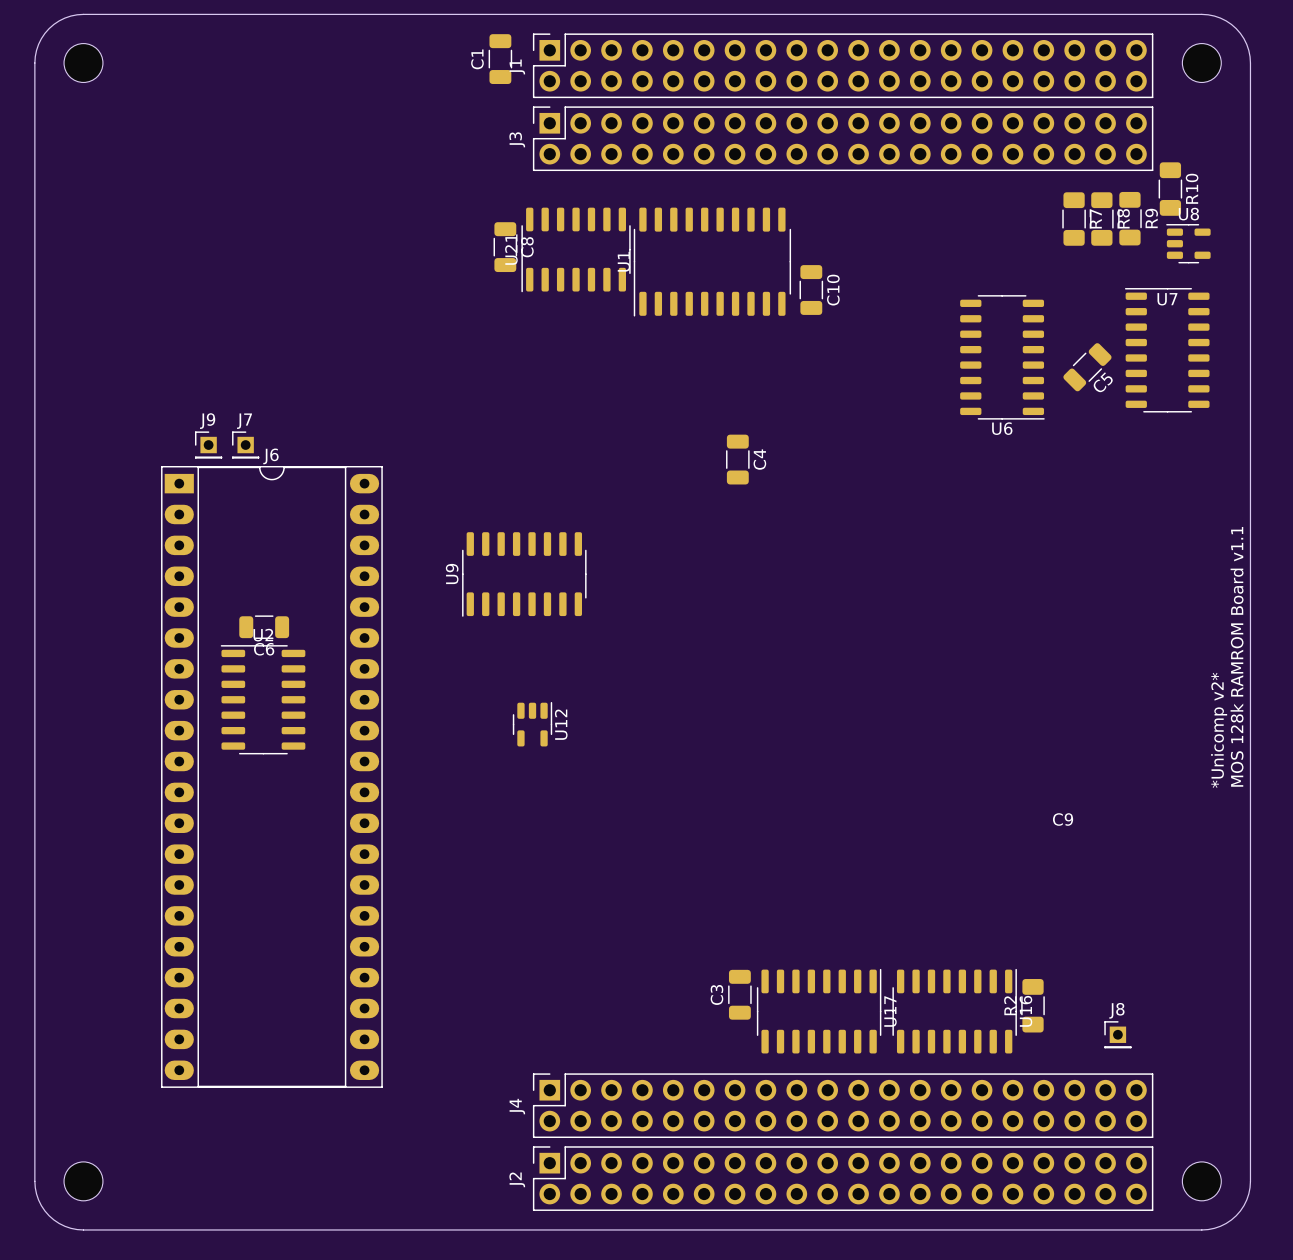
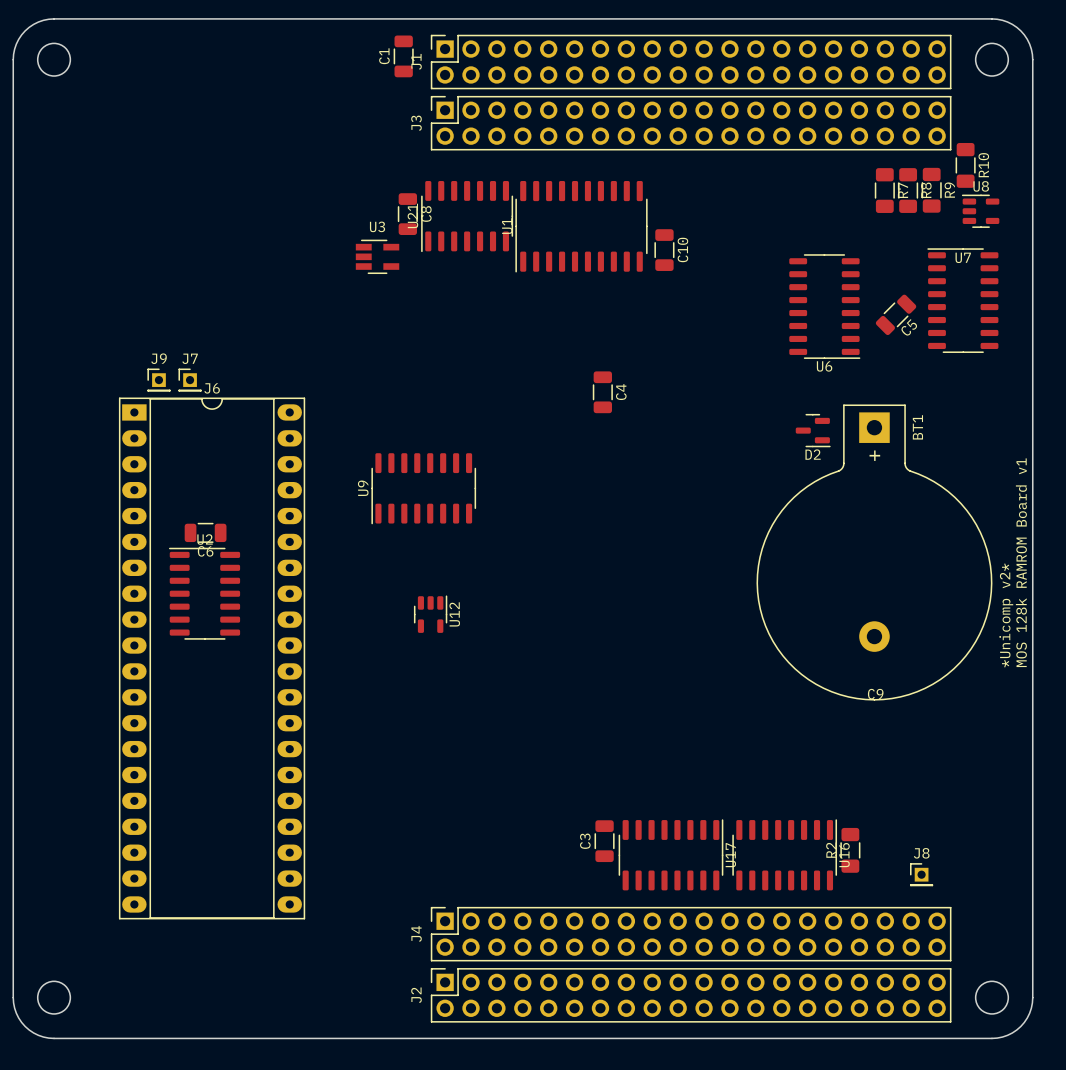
U3: none -> (377, 256)
D2: none -> (813, 430)
BT1: none -> (874, 552)
text: MOS 128k RAMROM Board v1.1 (1237, 656) -> MOS 128k RAMROM Board v1 (1021, 562)

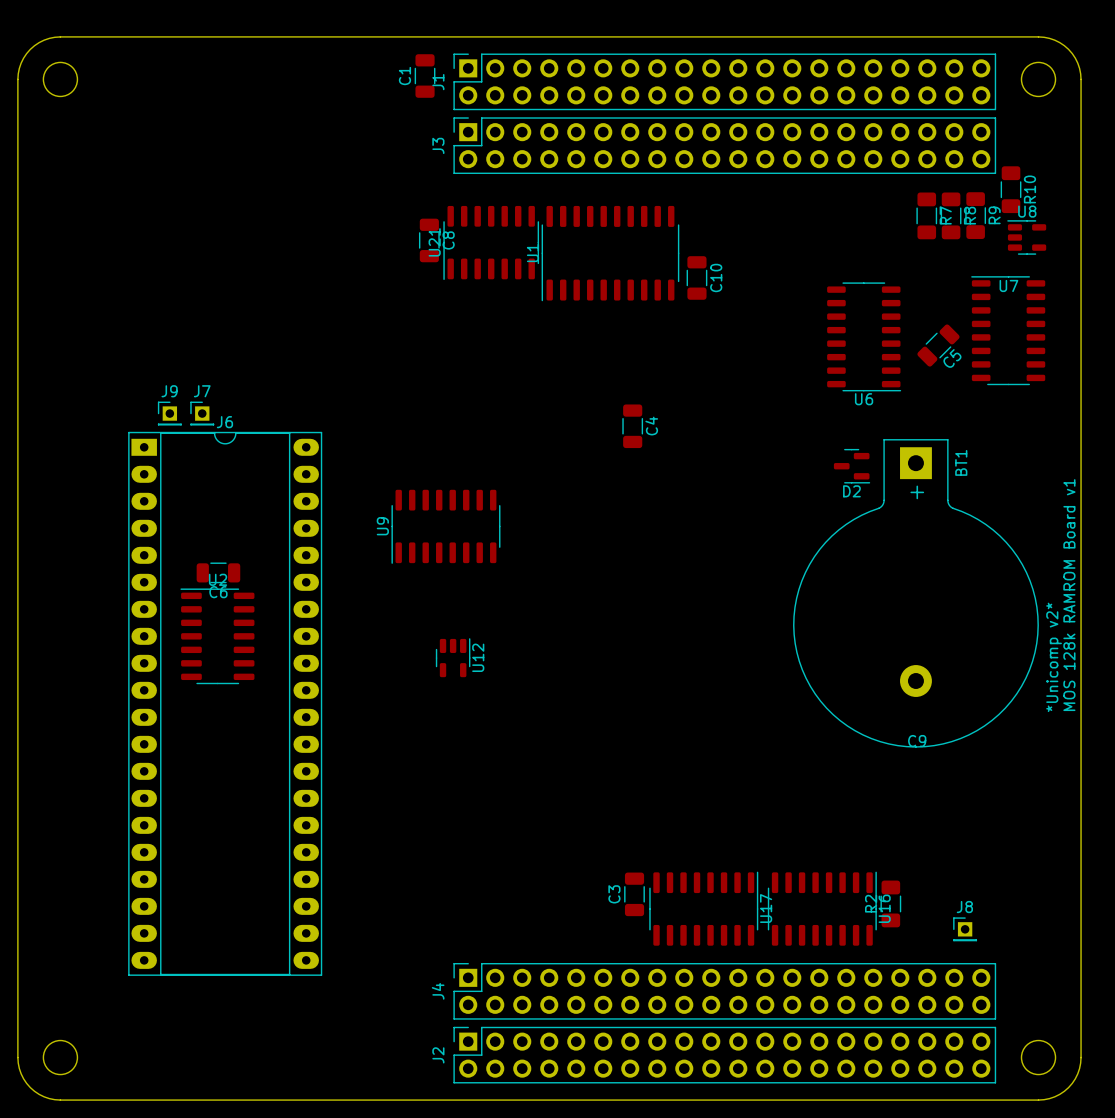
U3: (377, 256) -> none

